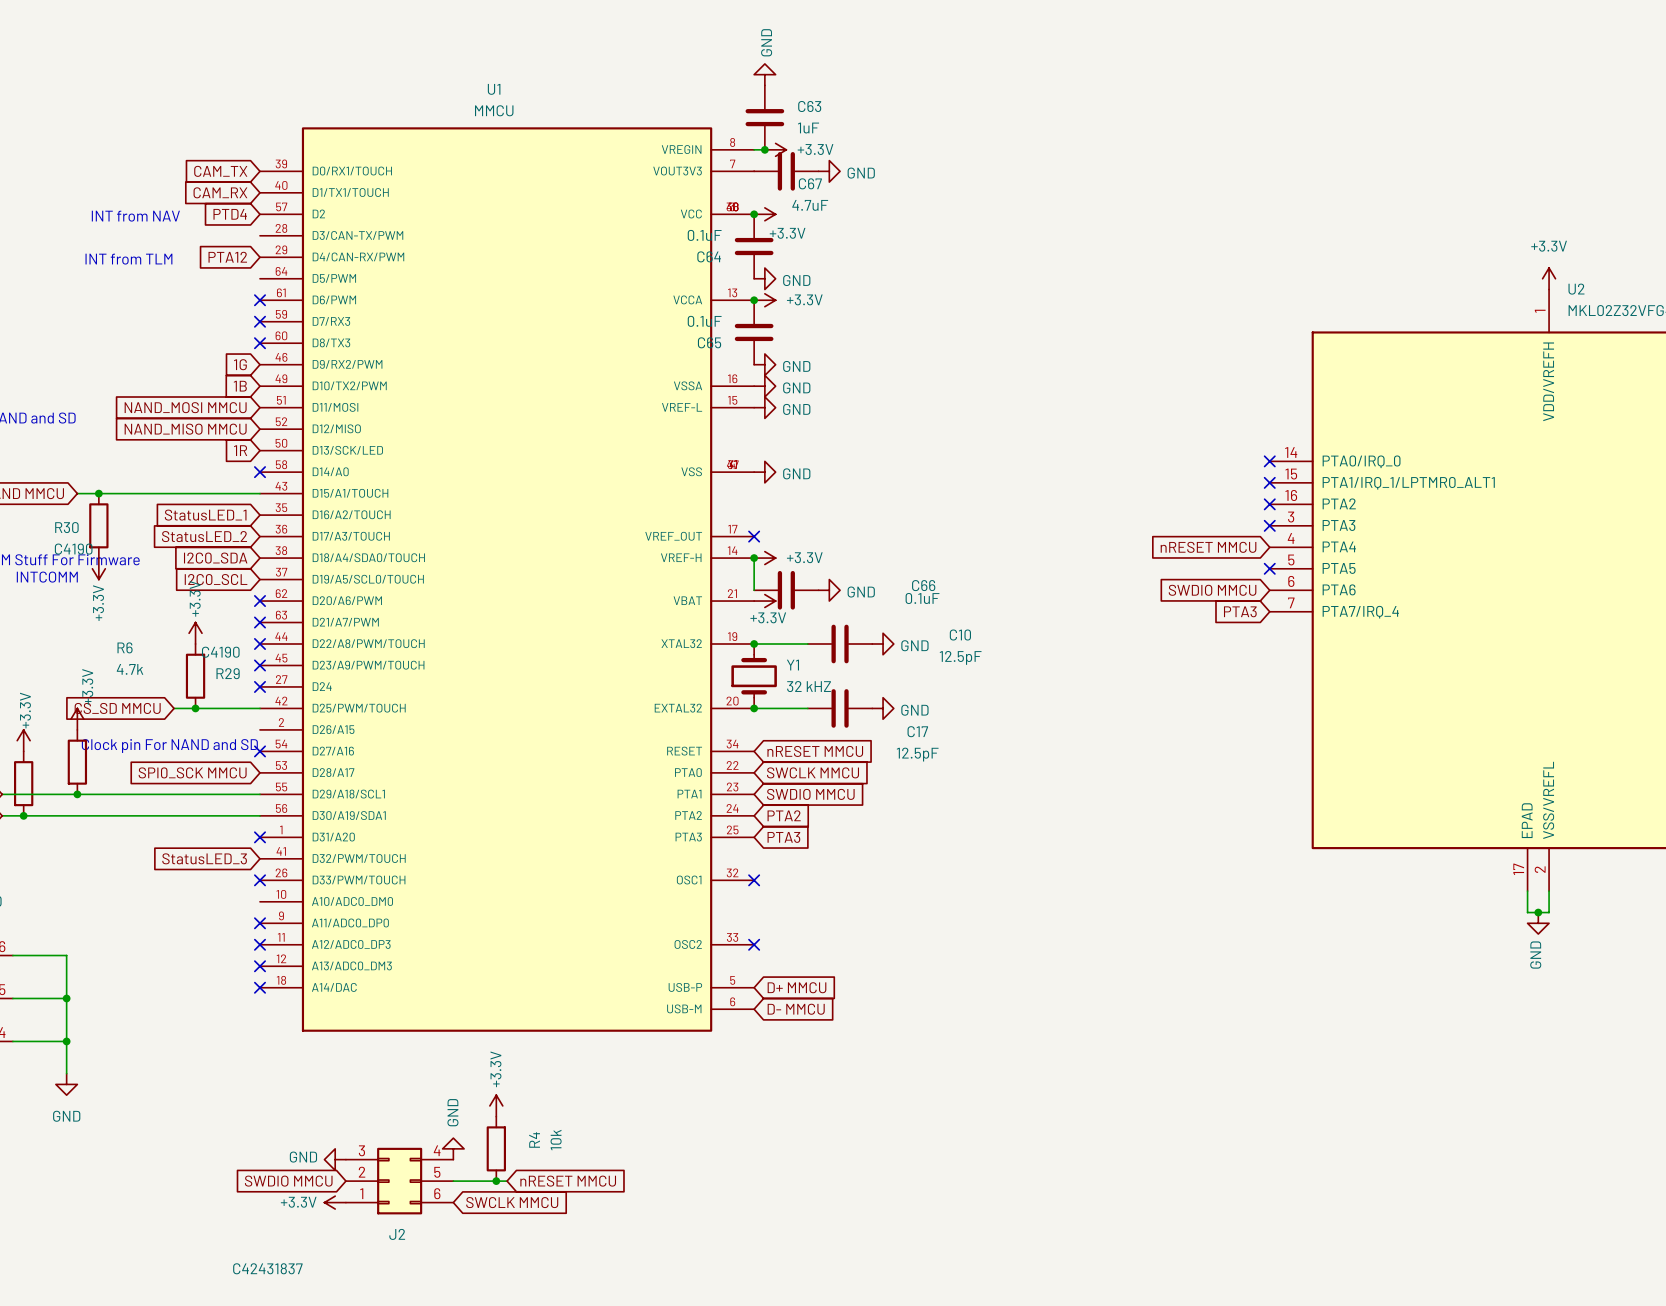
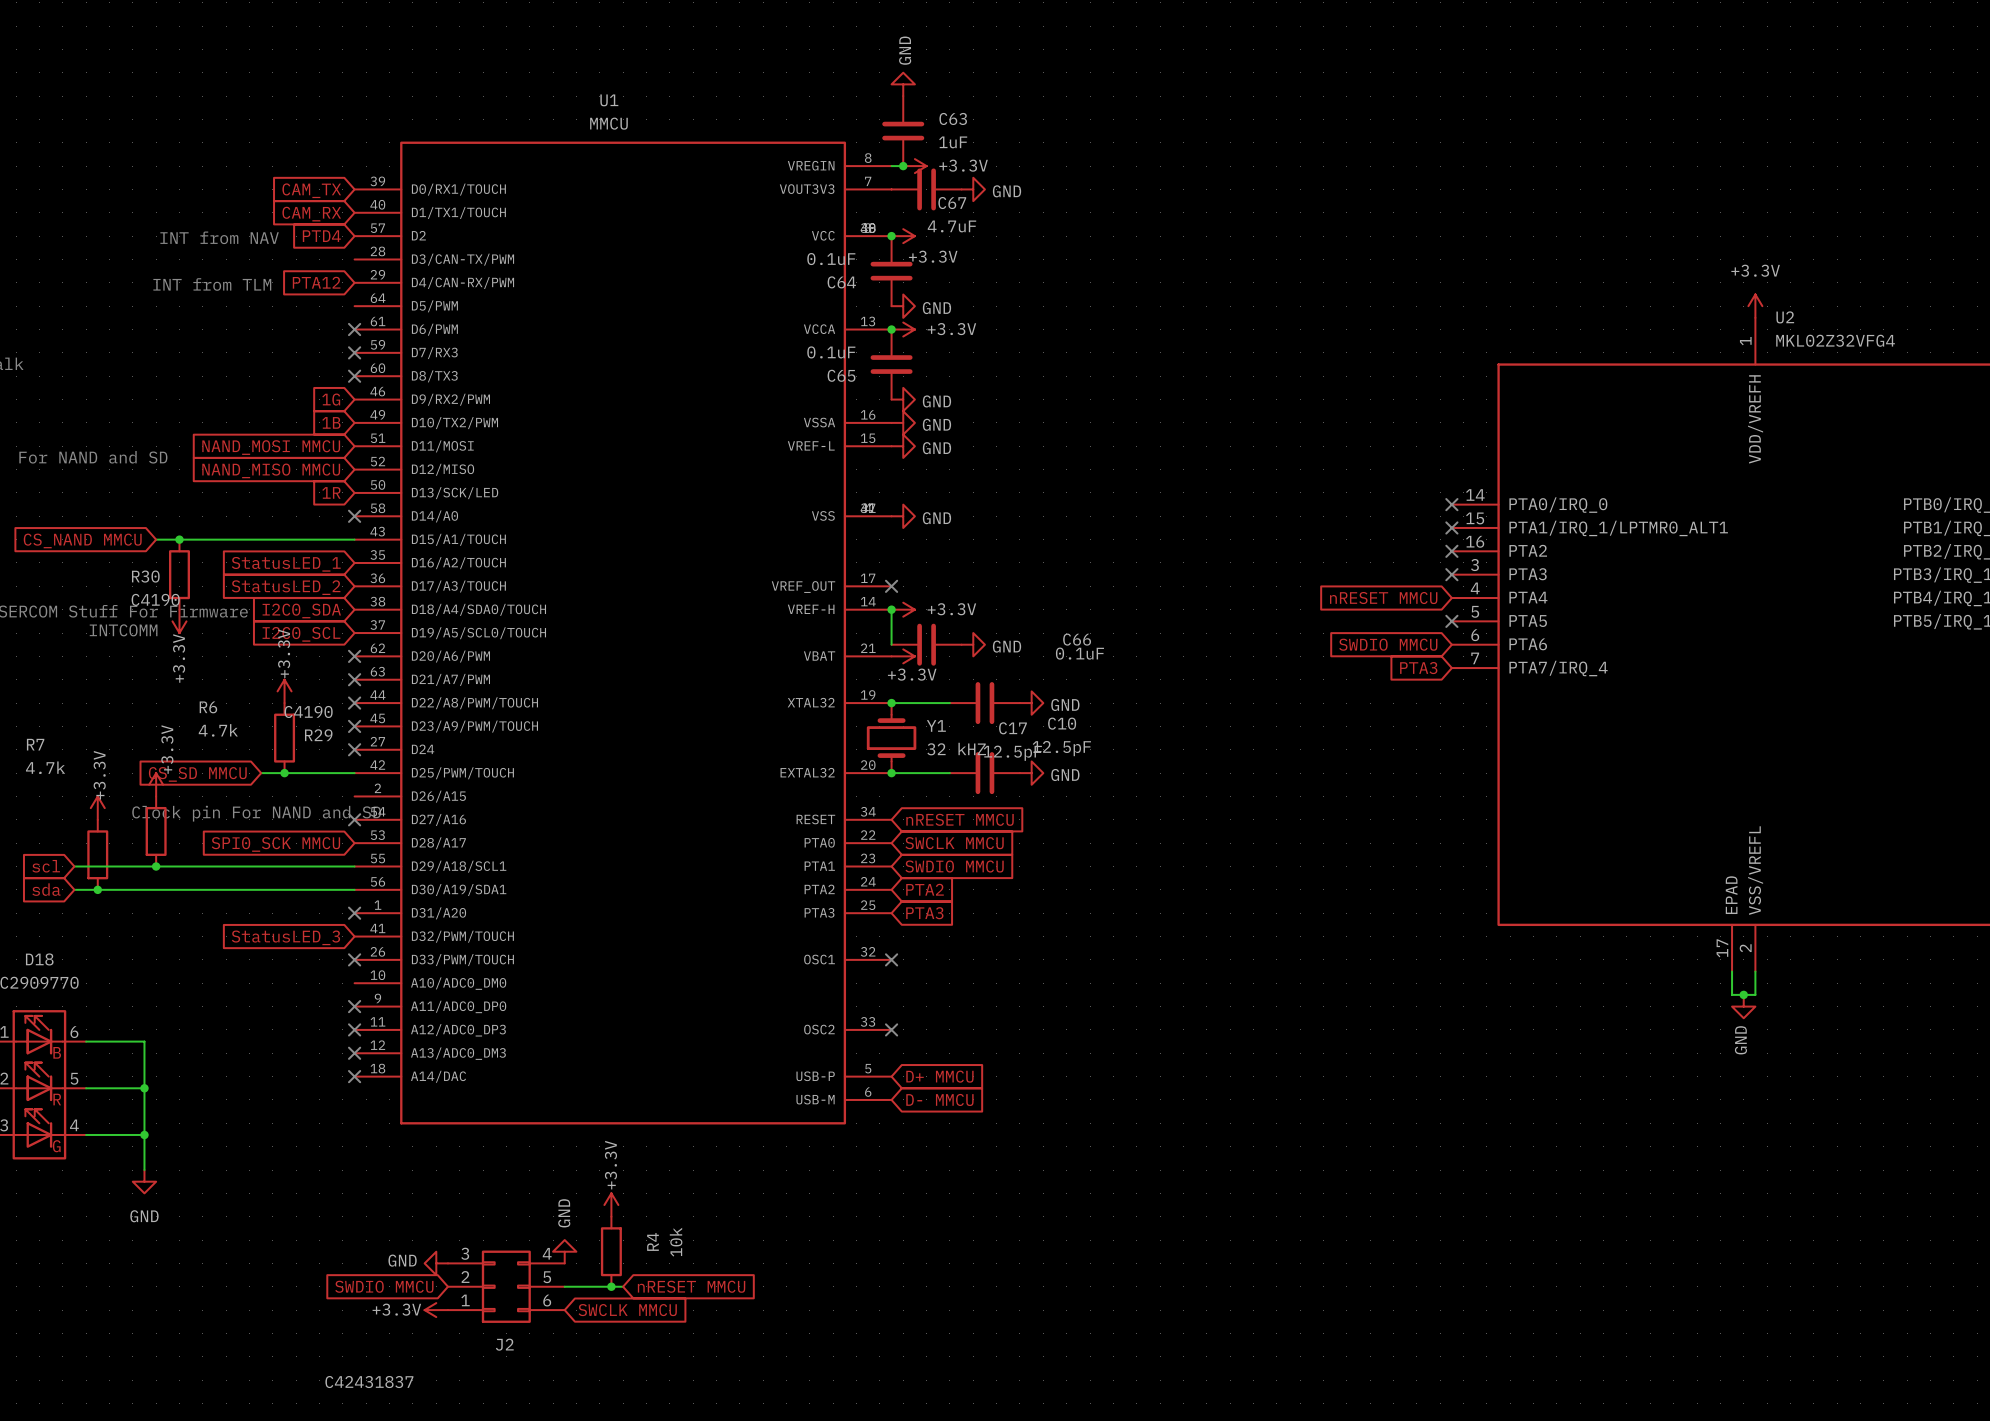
C10 name position: C10 (960, 635) -> C10 (1062, 723)
C10 value position: 12.5pF (960, 657) -> 12.5pF (1061, 748)
C17 name position: C17 (917, 731) -> C17 (1012, 728)
C17 value position: 12.5pF (917, 754) -> 12.5pF (1012, 753)

